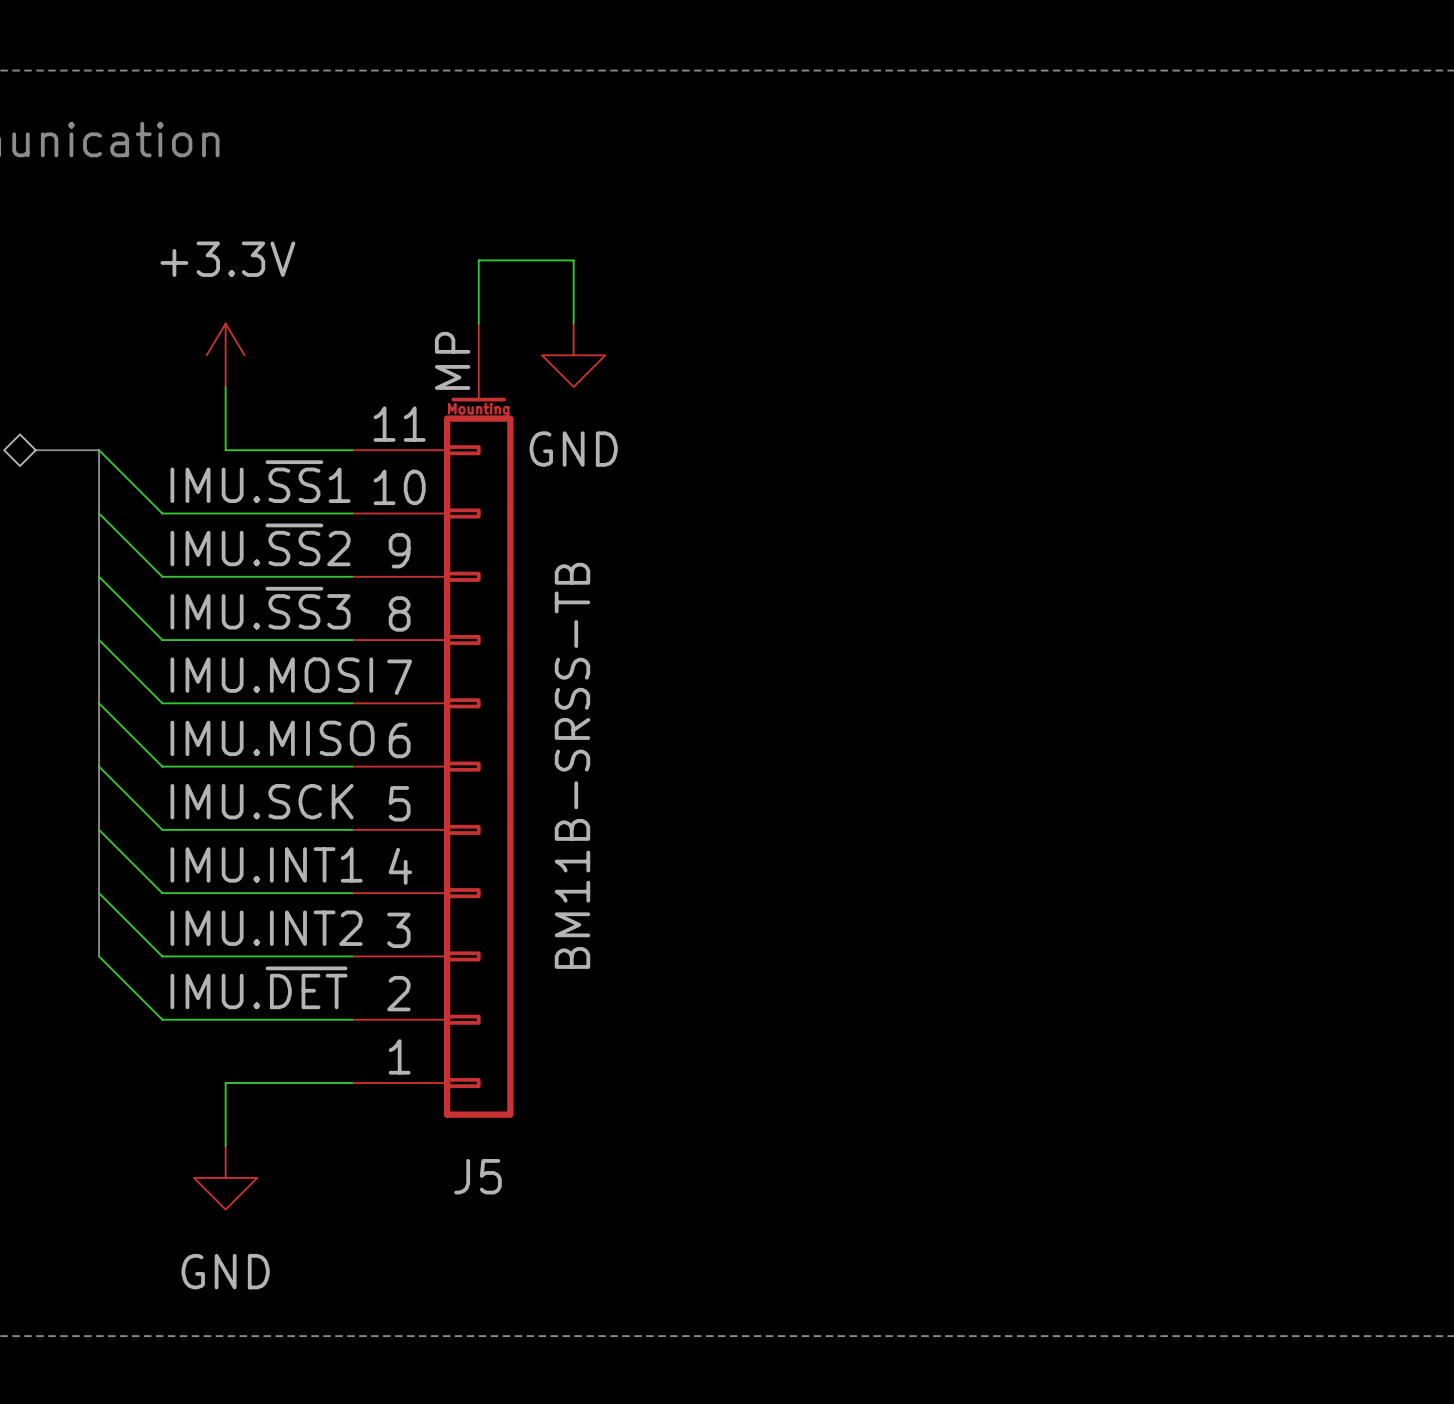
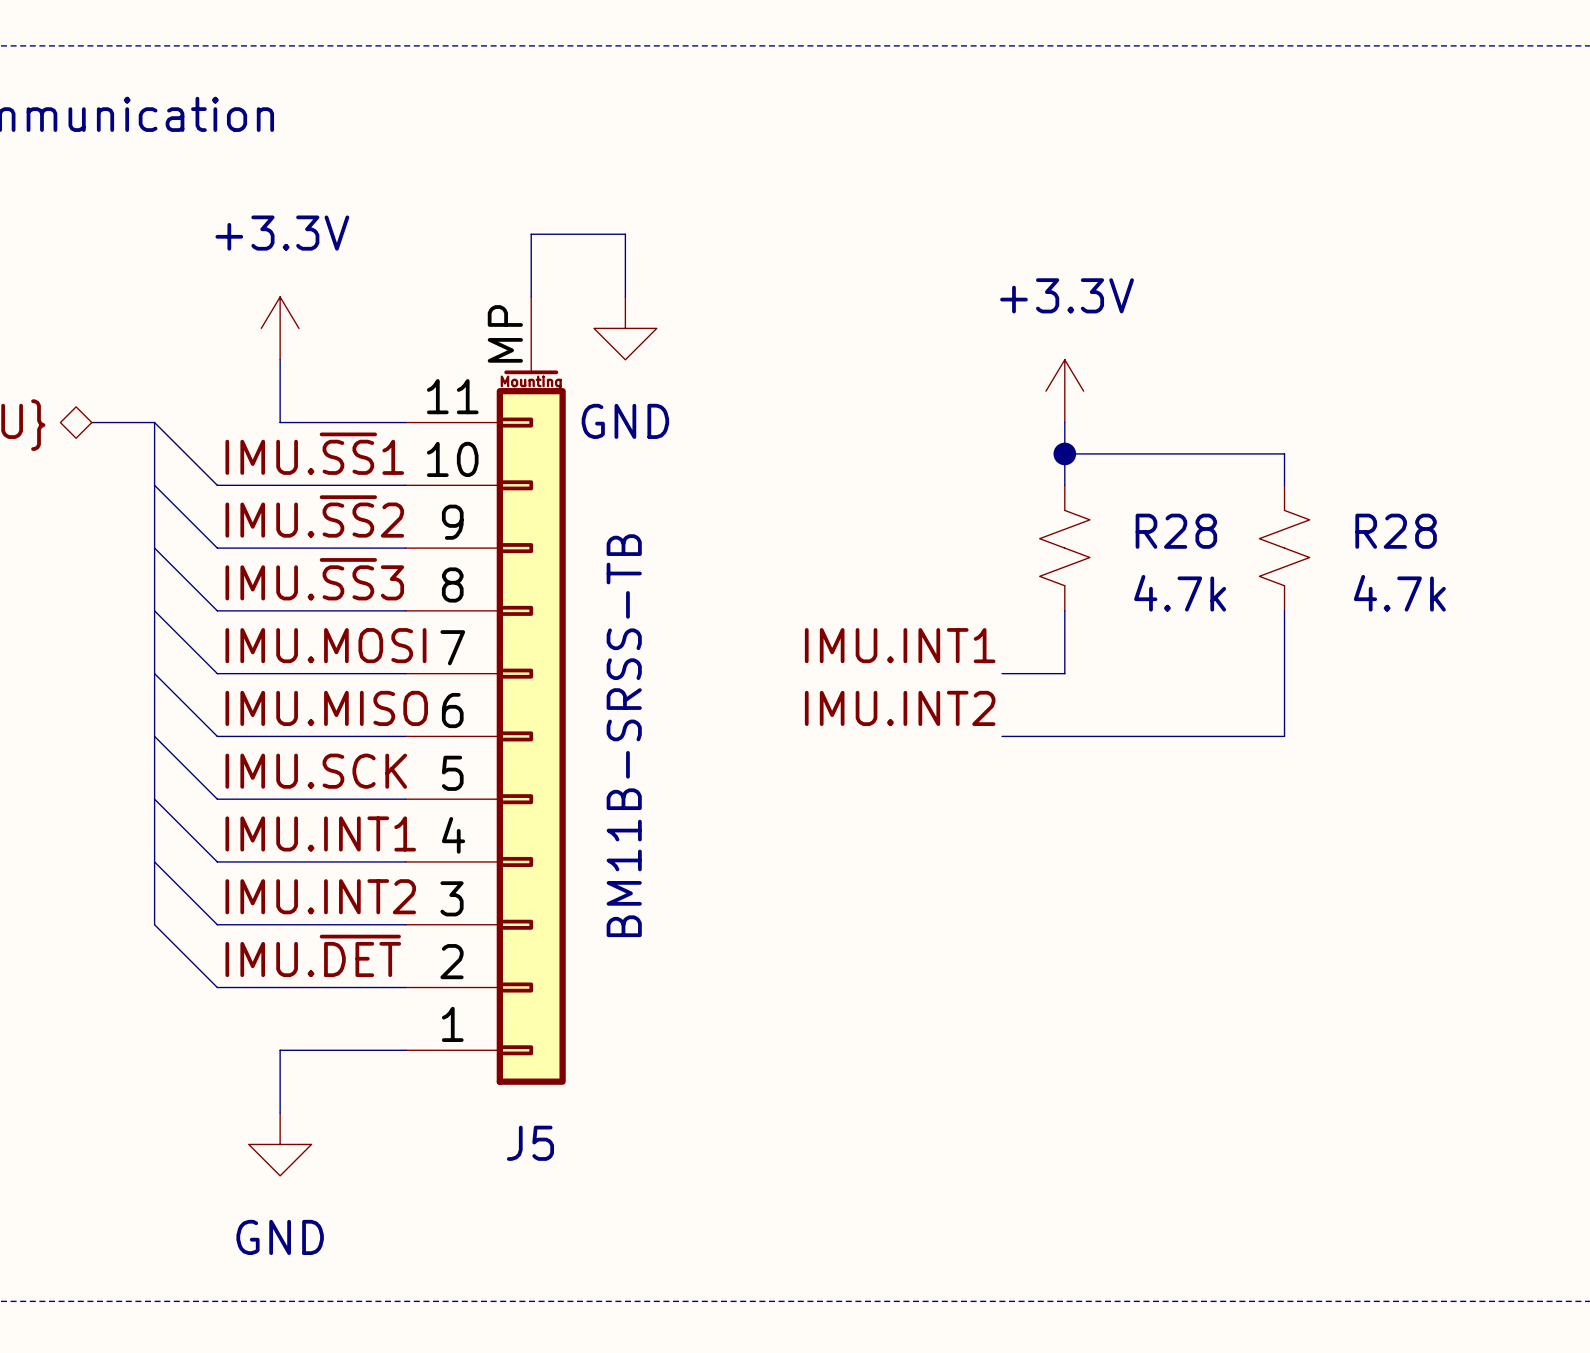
power symbol: none -> +3.3V (1064, 391)
wire: none -> (1064, 422) (1064, 485)
wire: none -> (1064, 453) (1284, 453) (1284, 485)
junction: none -> (1064, 453)
R28: none -> 4.7k (1064, 548)
R28: none -> 4.7k (1284, 548)
wire: none -> (1064, 610) (1064, 673) (1002, 673)
wire: none -> (1284, 610) (1284, 736) (1002, 736)
label: none -> IMU.INT1 (900, 645)
label: none -> IMU.INT2 (900, 708)

